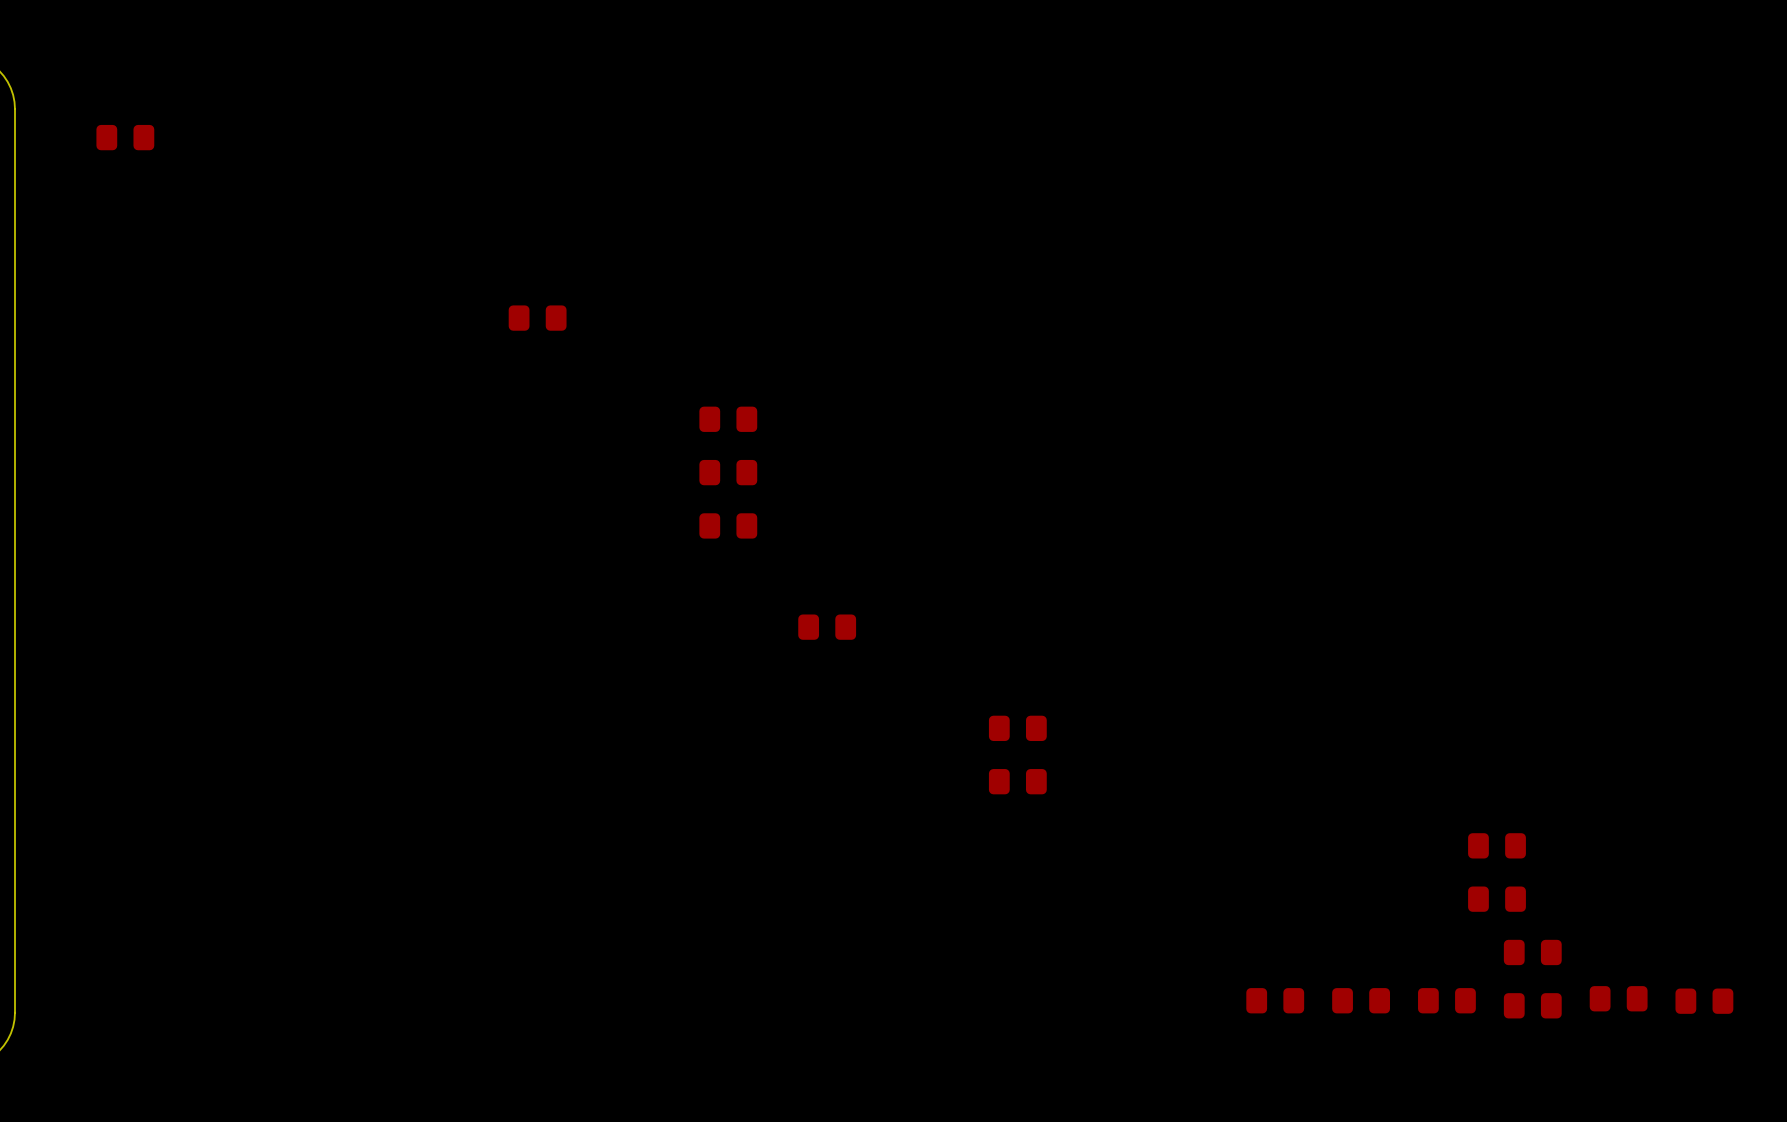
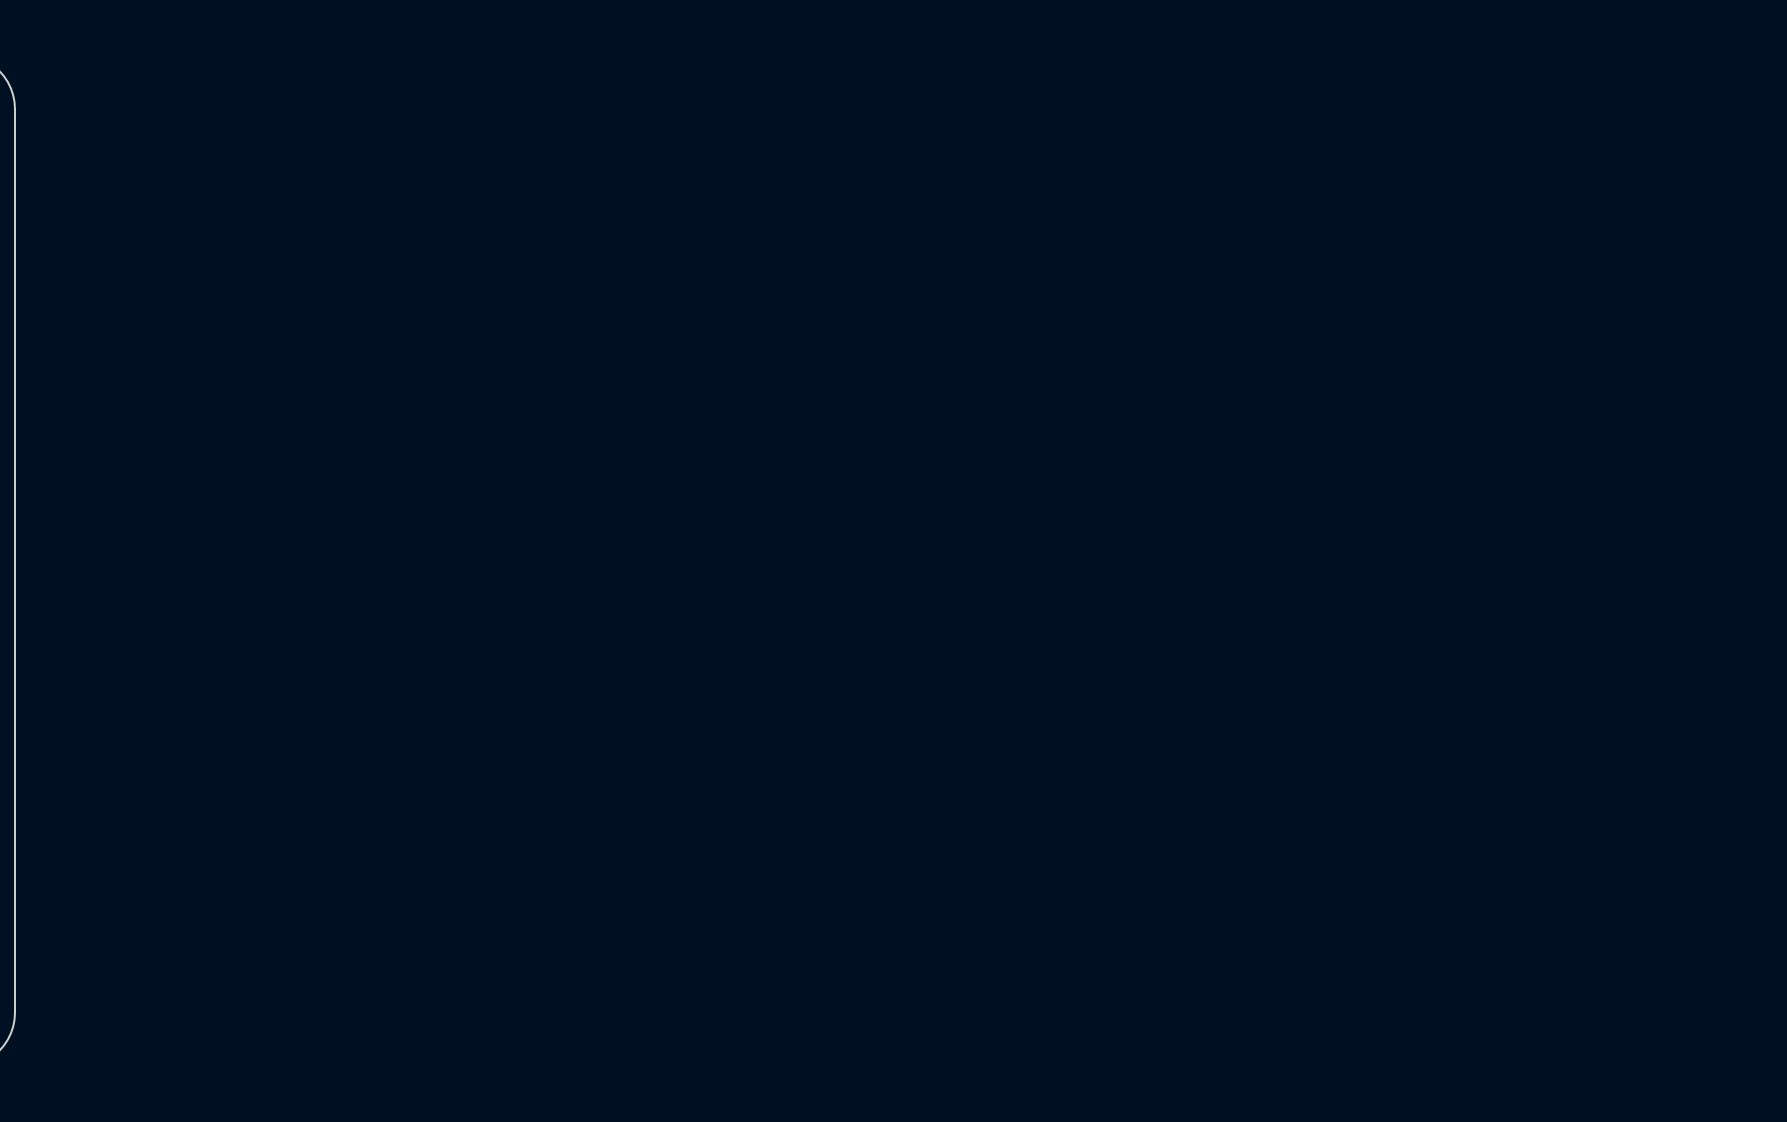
part: (125, 137) -> none
part: (537, 318) -> none
part: (728, 419) -> none
part: (728, 472) -> none
part: (728, 525) -> none
part: (827, 627) -> none
part: (1017, 728) -> none
part: (1017, 781) -> none
part: (1497, 845) -> none
part: (1497, 899) -> none
part: (1532, 952) -> none
part: (1618, 998) -> none
part: (1275, 1000) -> none
part: (1361, 1000) -> none
part: (1446, 1000) -> none
part: (1704, 1001) -> none
part: (1532, 1005) -> none

